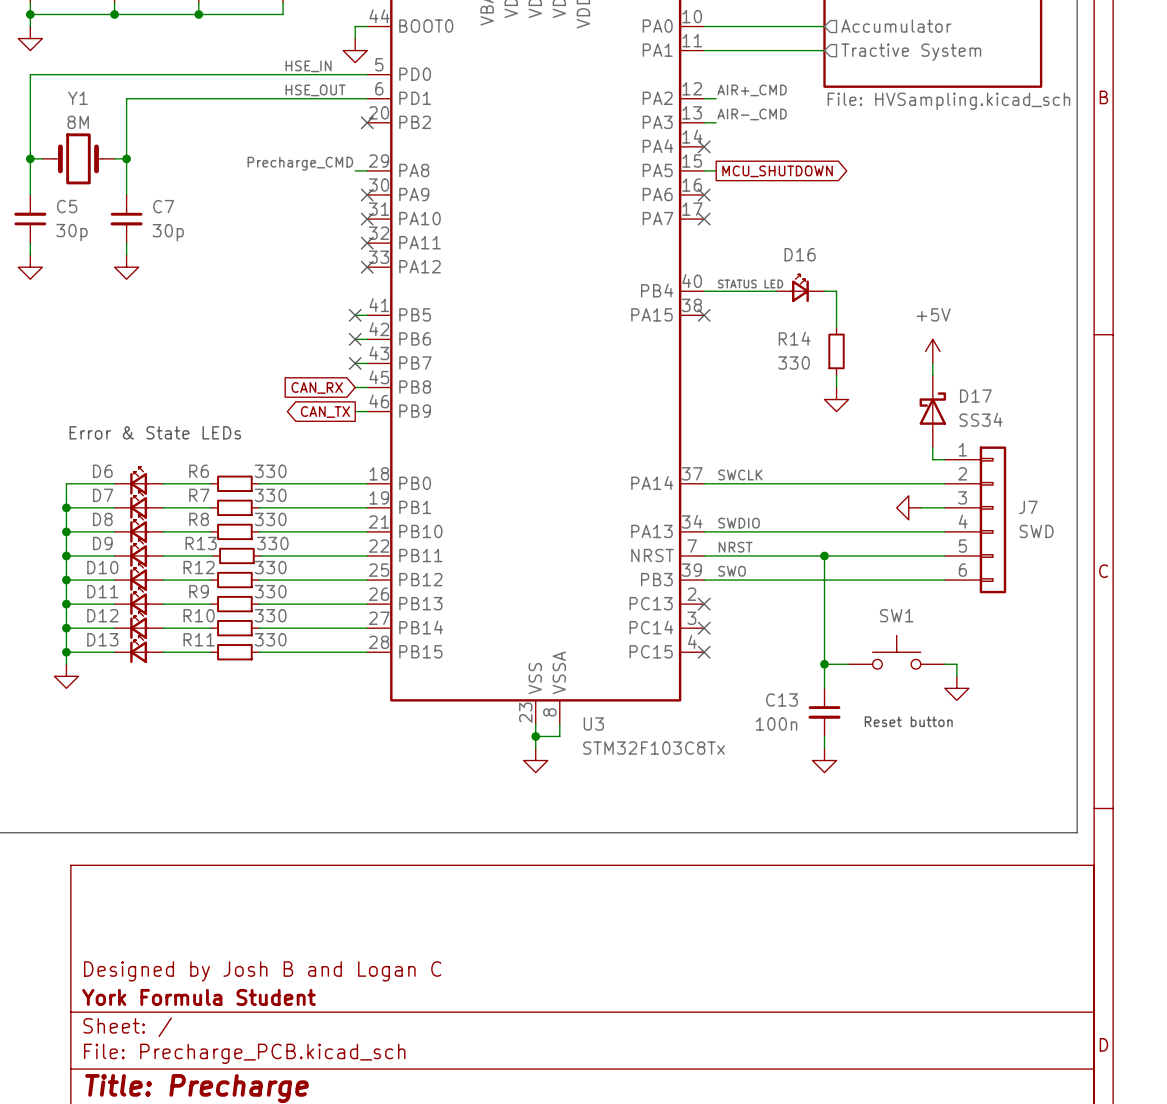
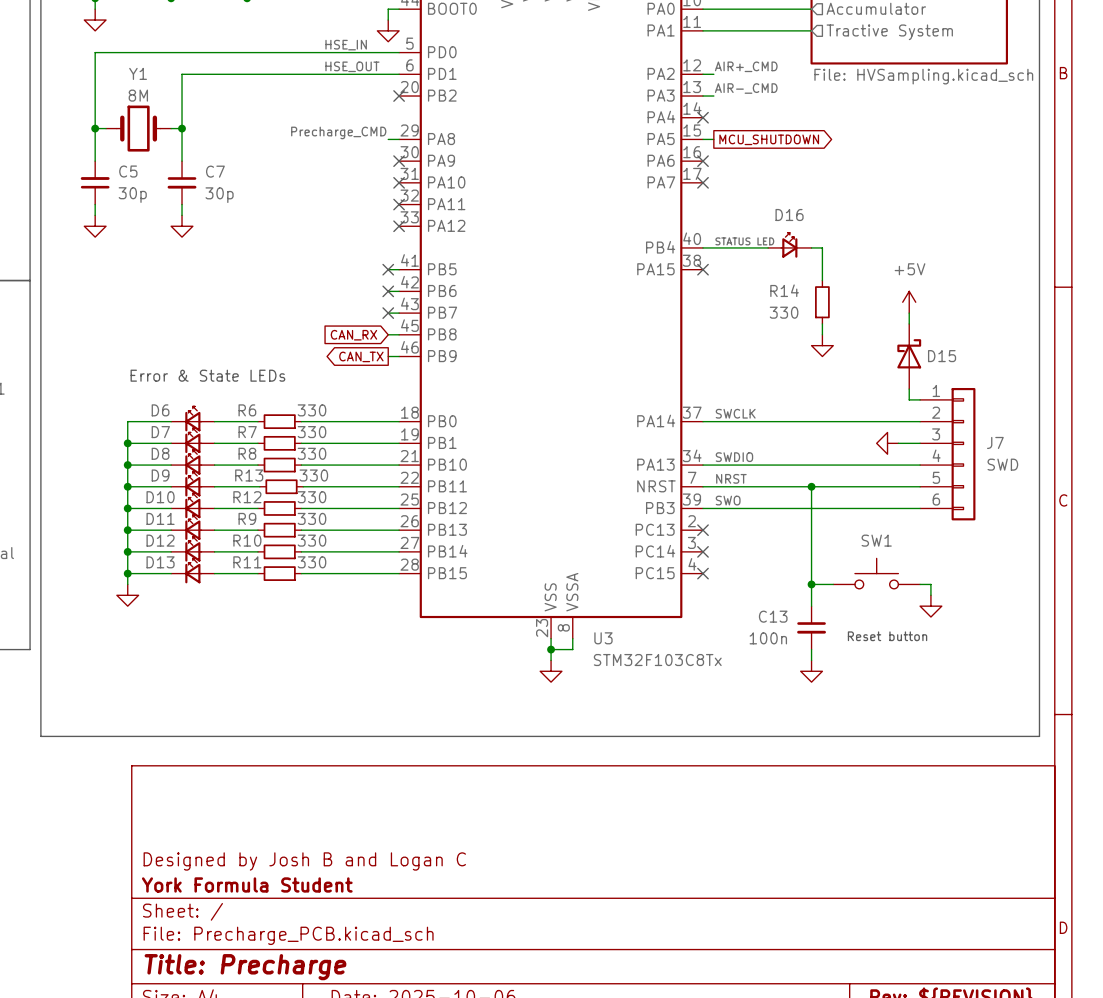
D17 name: D17 (975, 396) -> D15 (942, 356)
D17 value: SS34 (981, 419) -> none

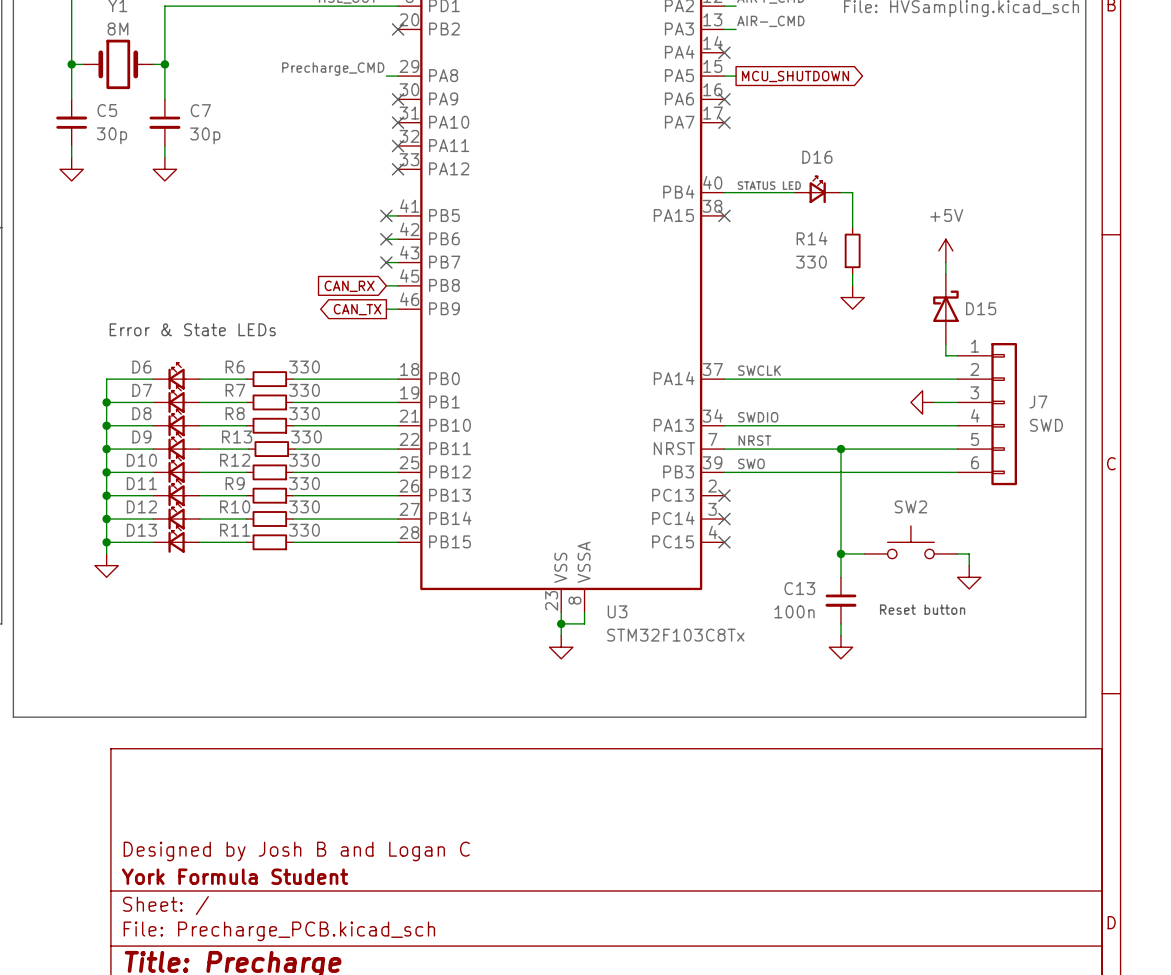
SW1 name: SW1 (876, 540) -> SW2 (910, 506)

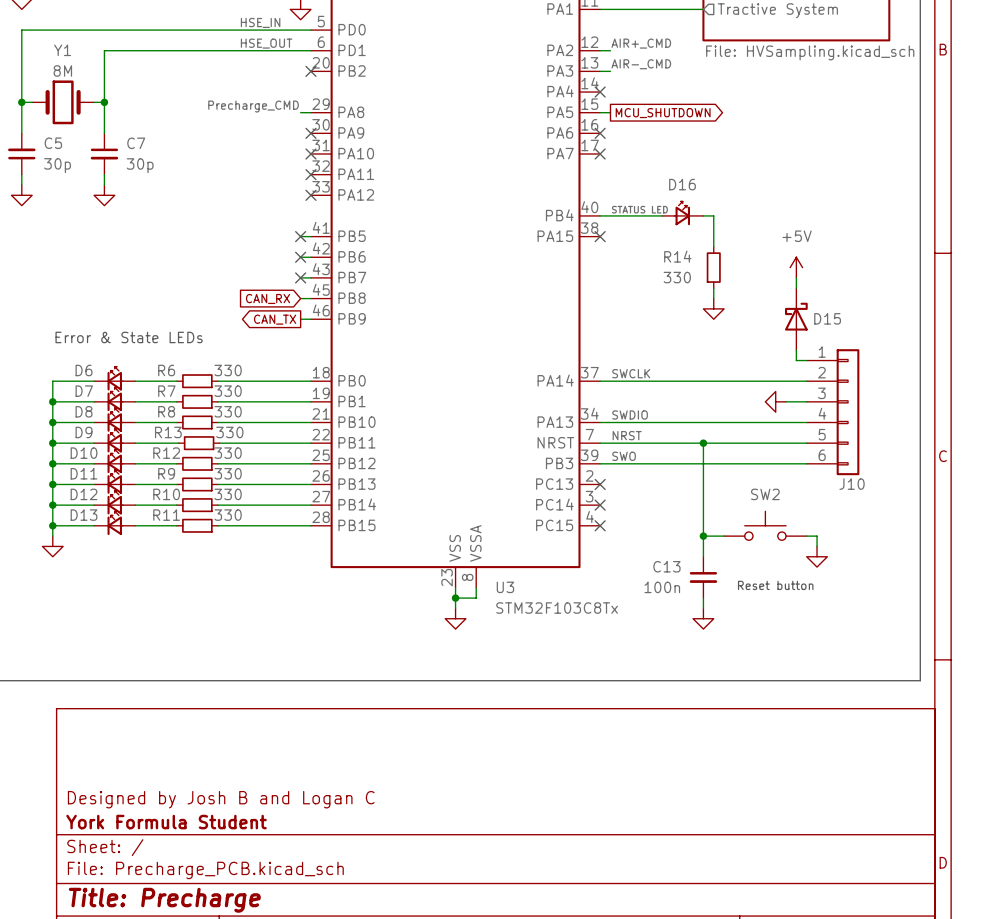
J7 name: J7 (1038, 402) -> J10 (852, 484)
J7 value: SWD (1046, 425) -> none

